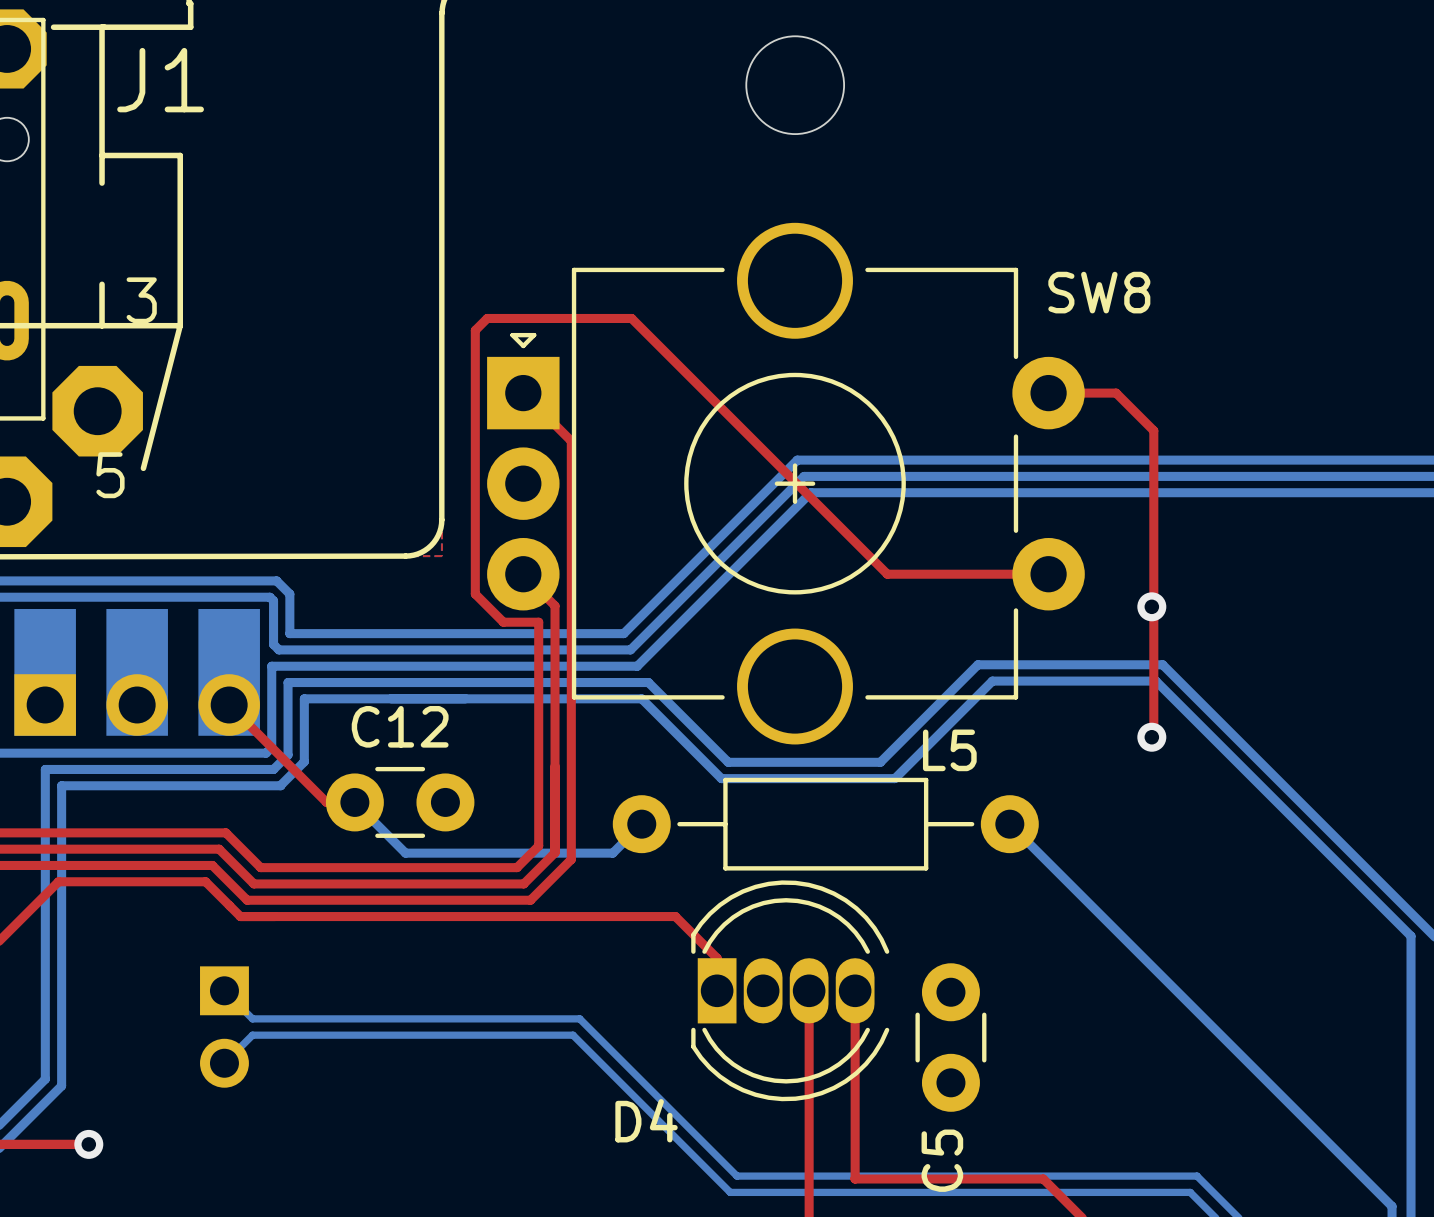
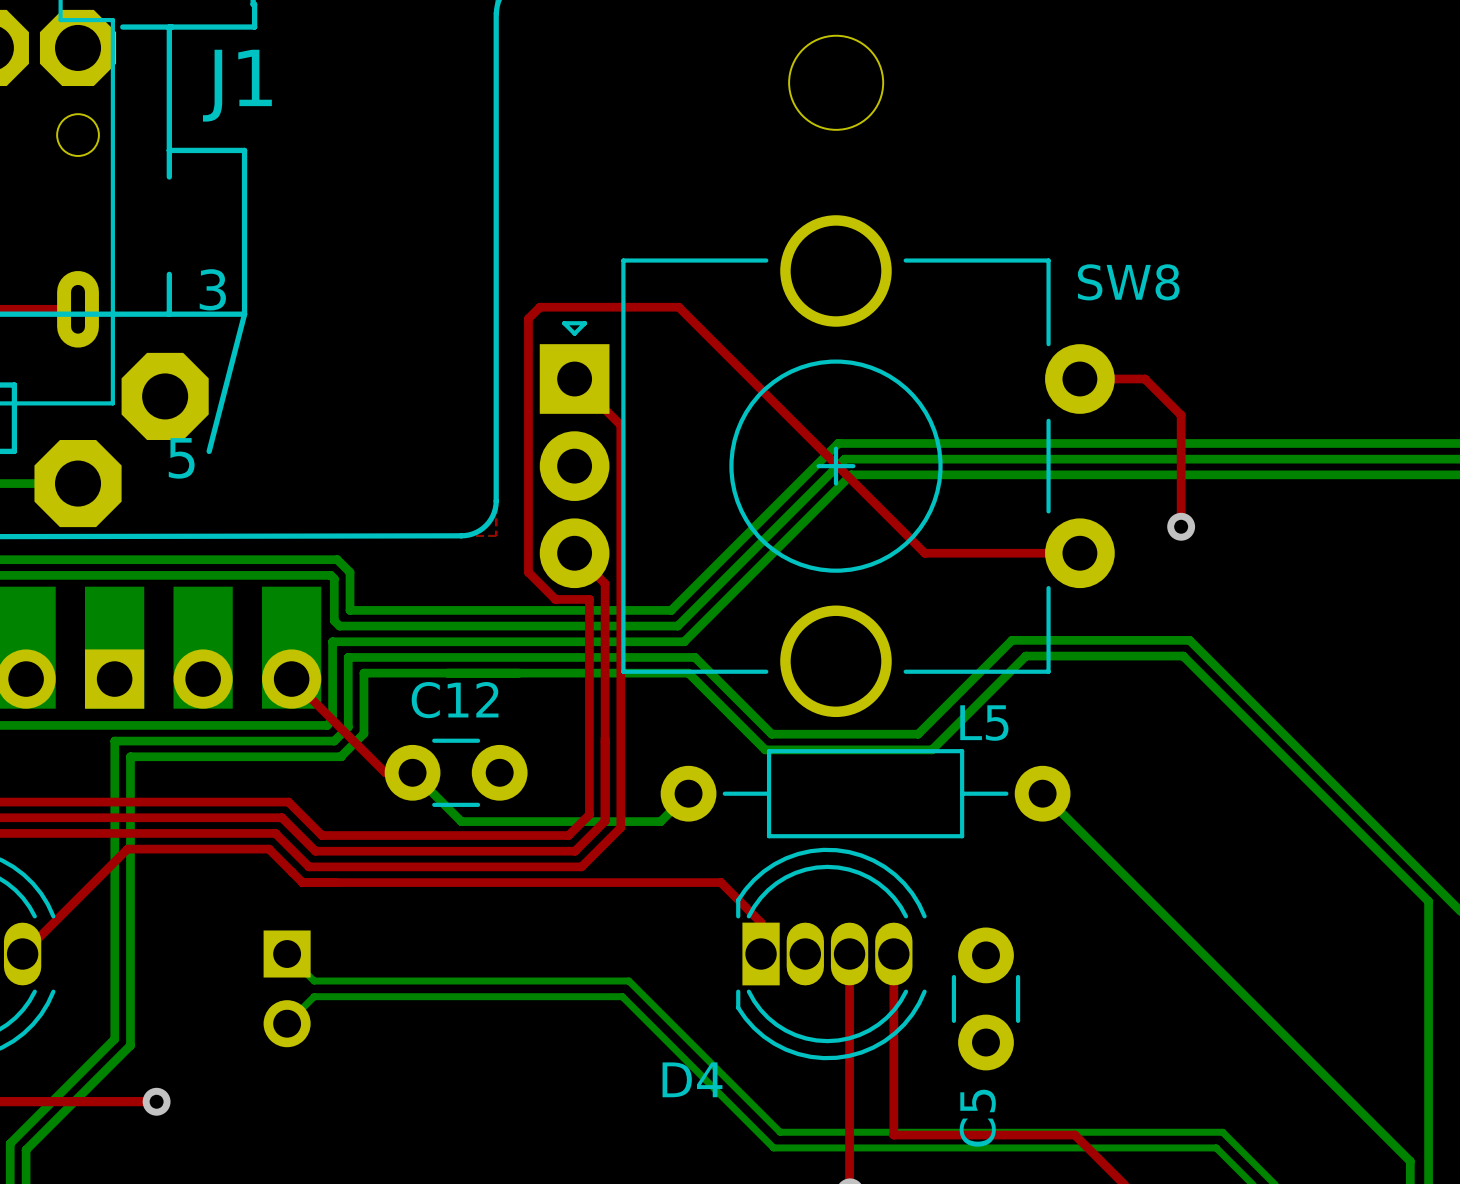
top track: (1153, 535) (1153, 604) (1151, 606) (1153, 608) (1153, 735) (1151, 737) -> none
via position: (1151, 606) -> (1181, 526)
via: (1151, 737) -> none

